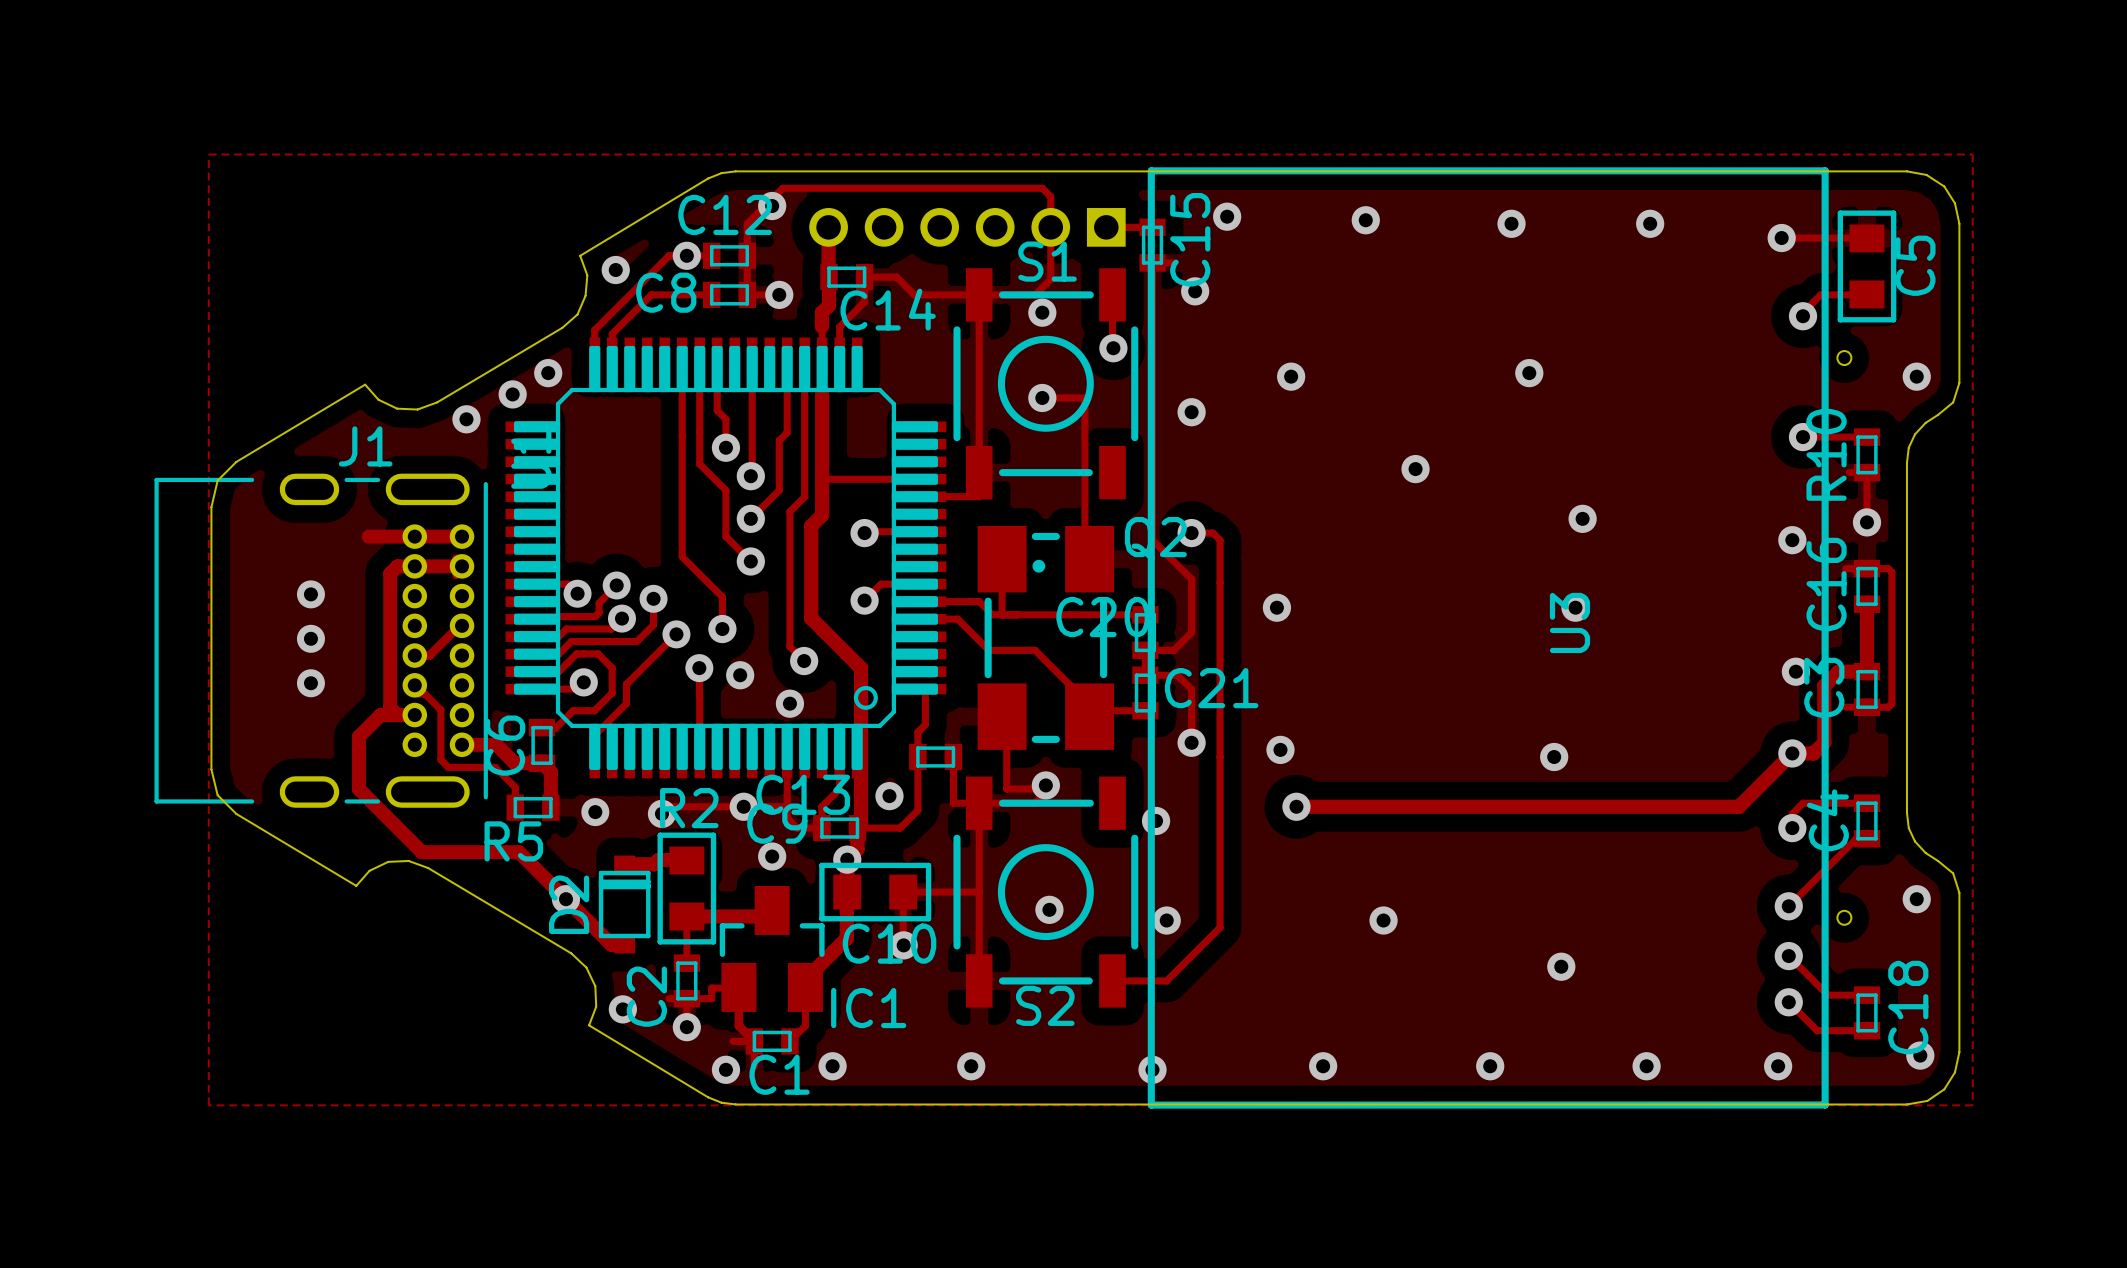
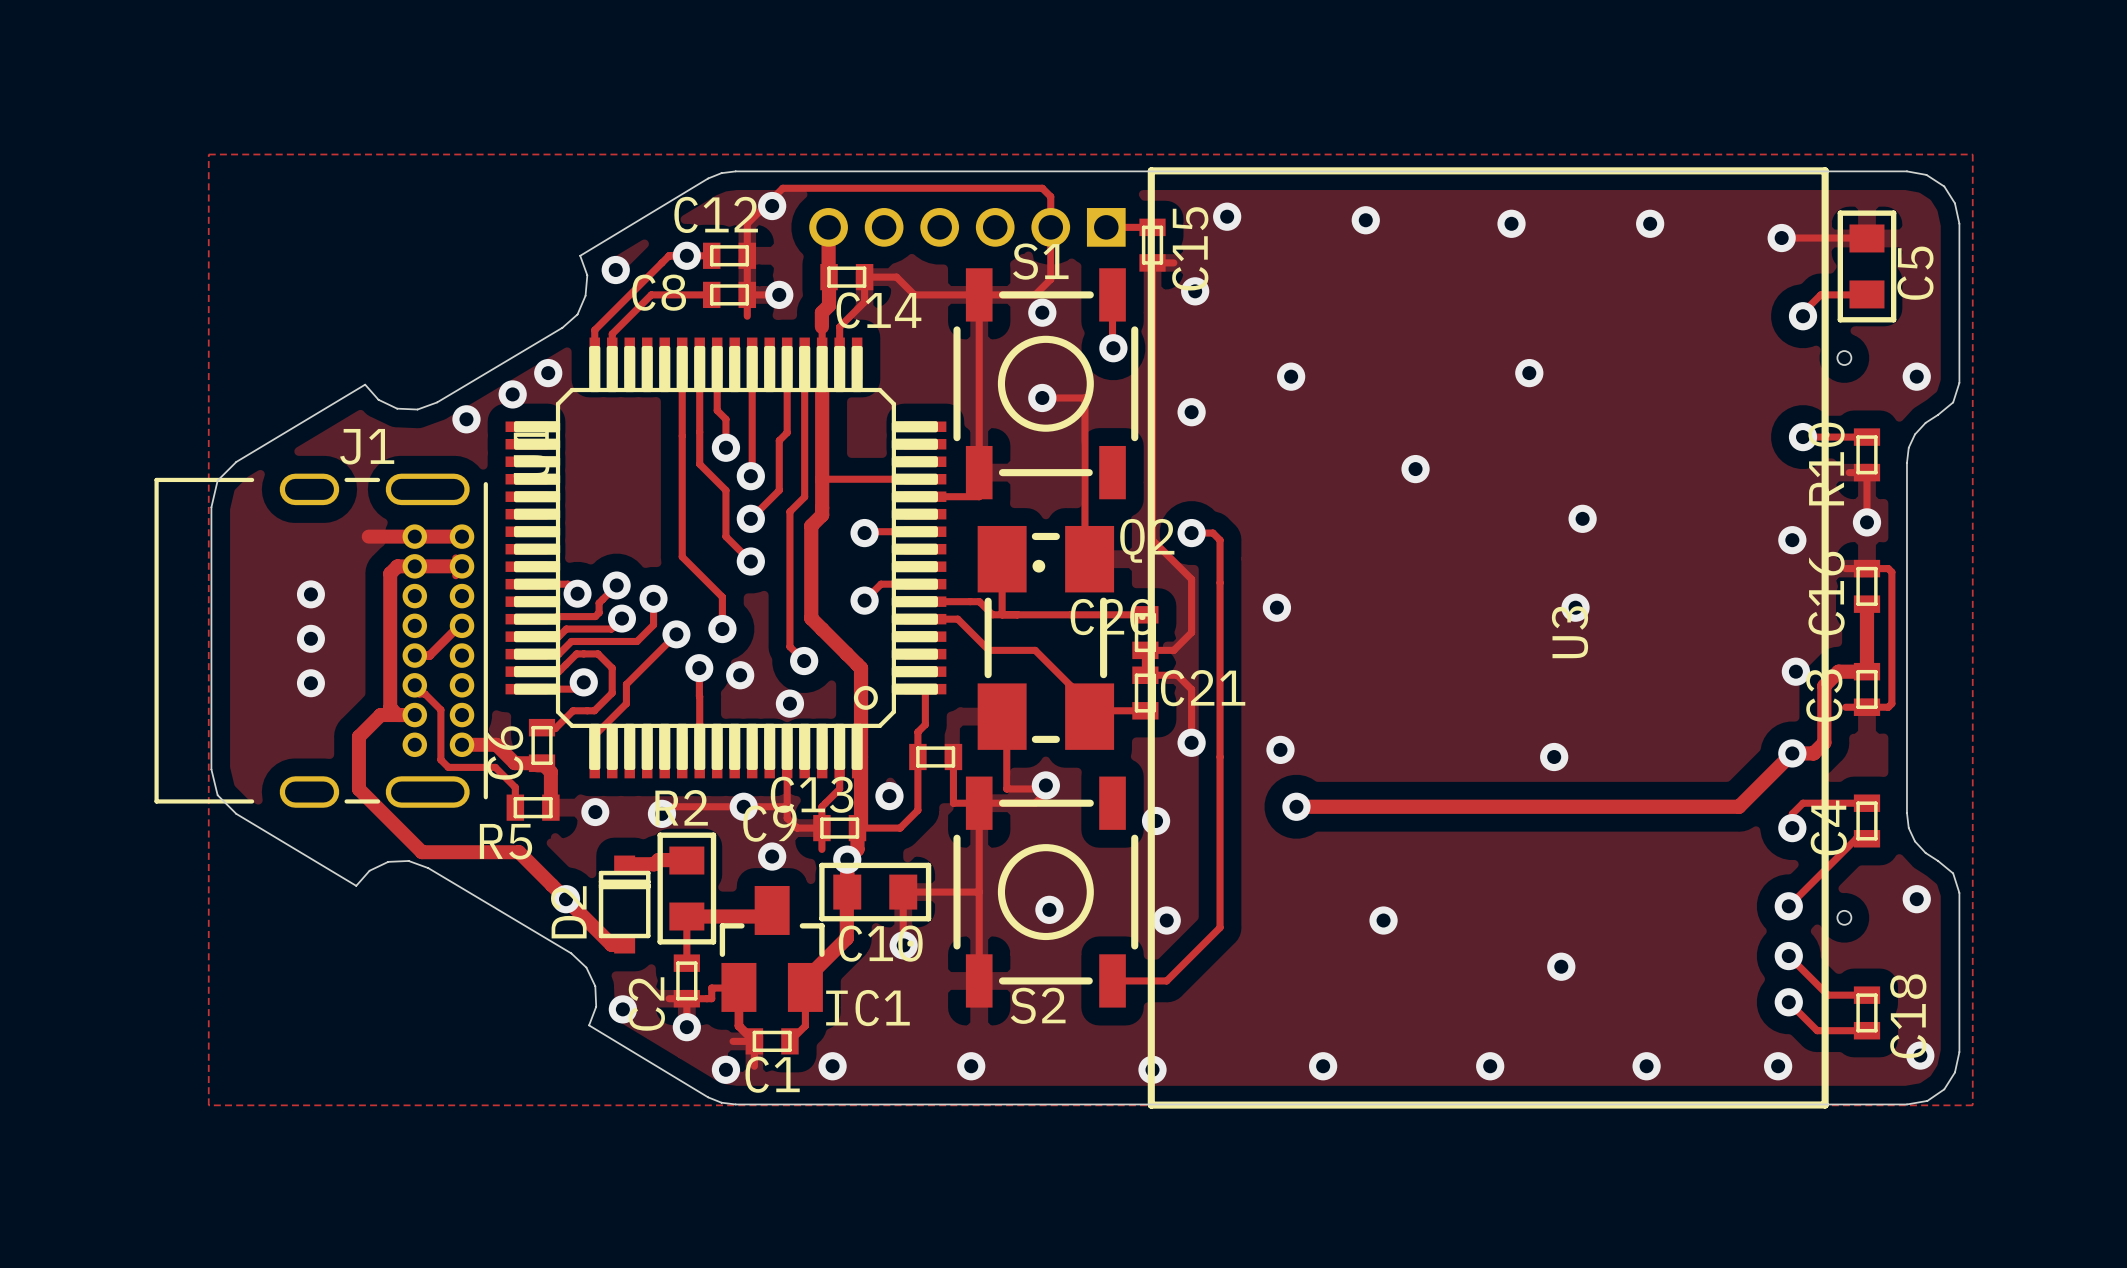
track: none -> (747, 294) (747, 316)
track: none -> (821, 828) (821, 849)

